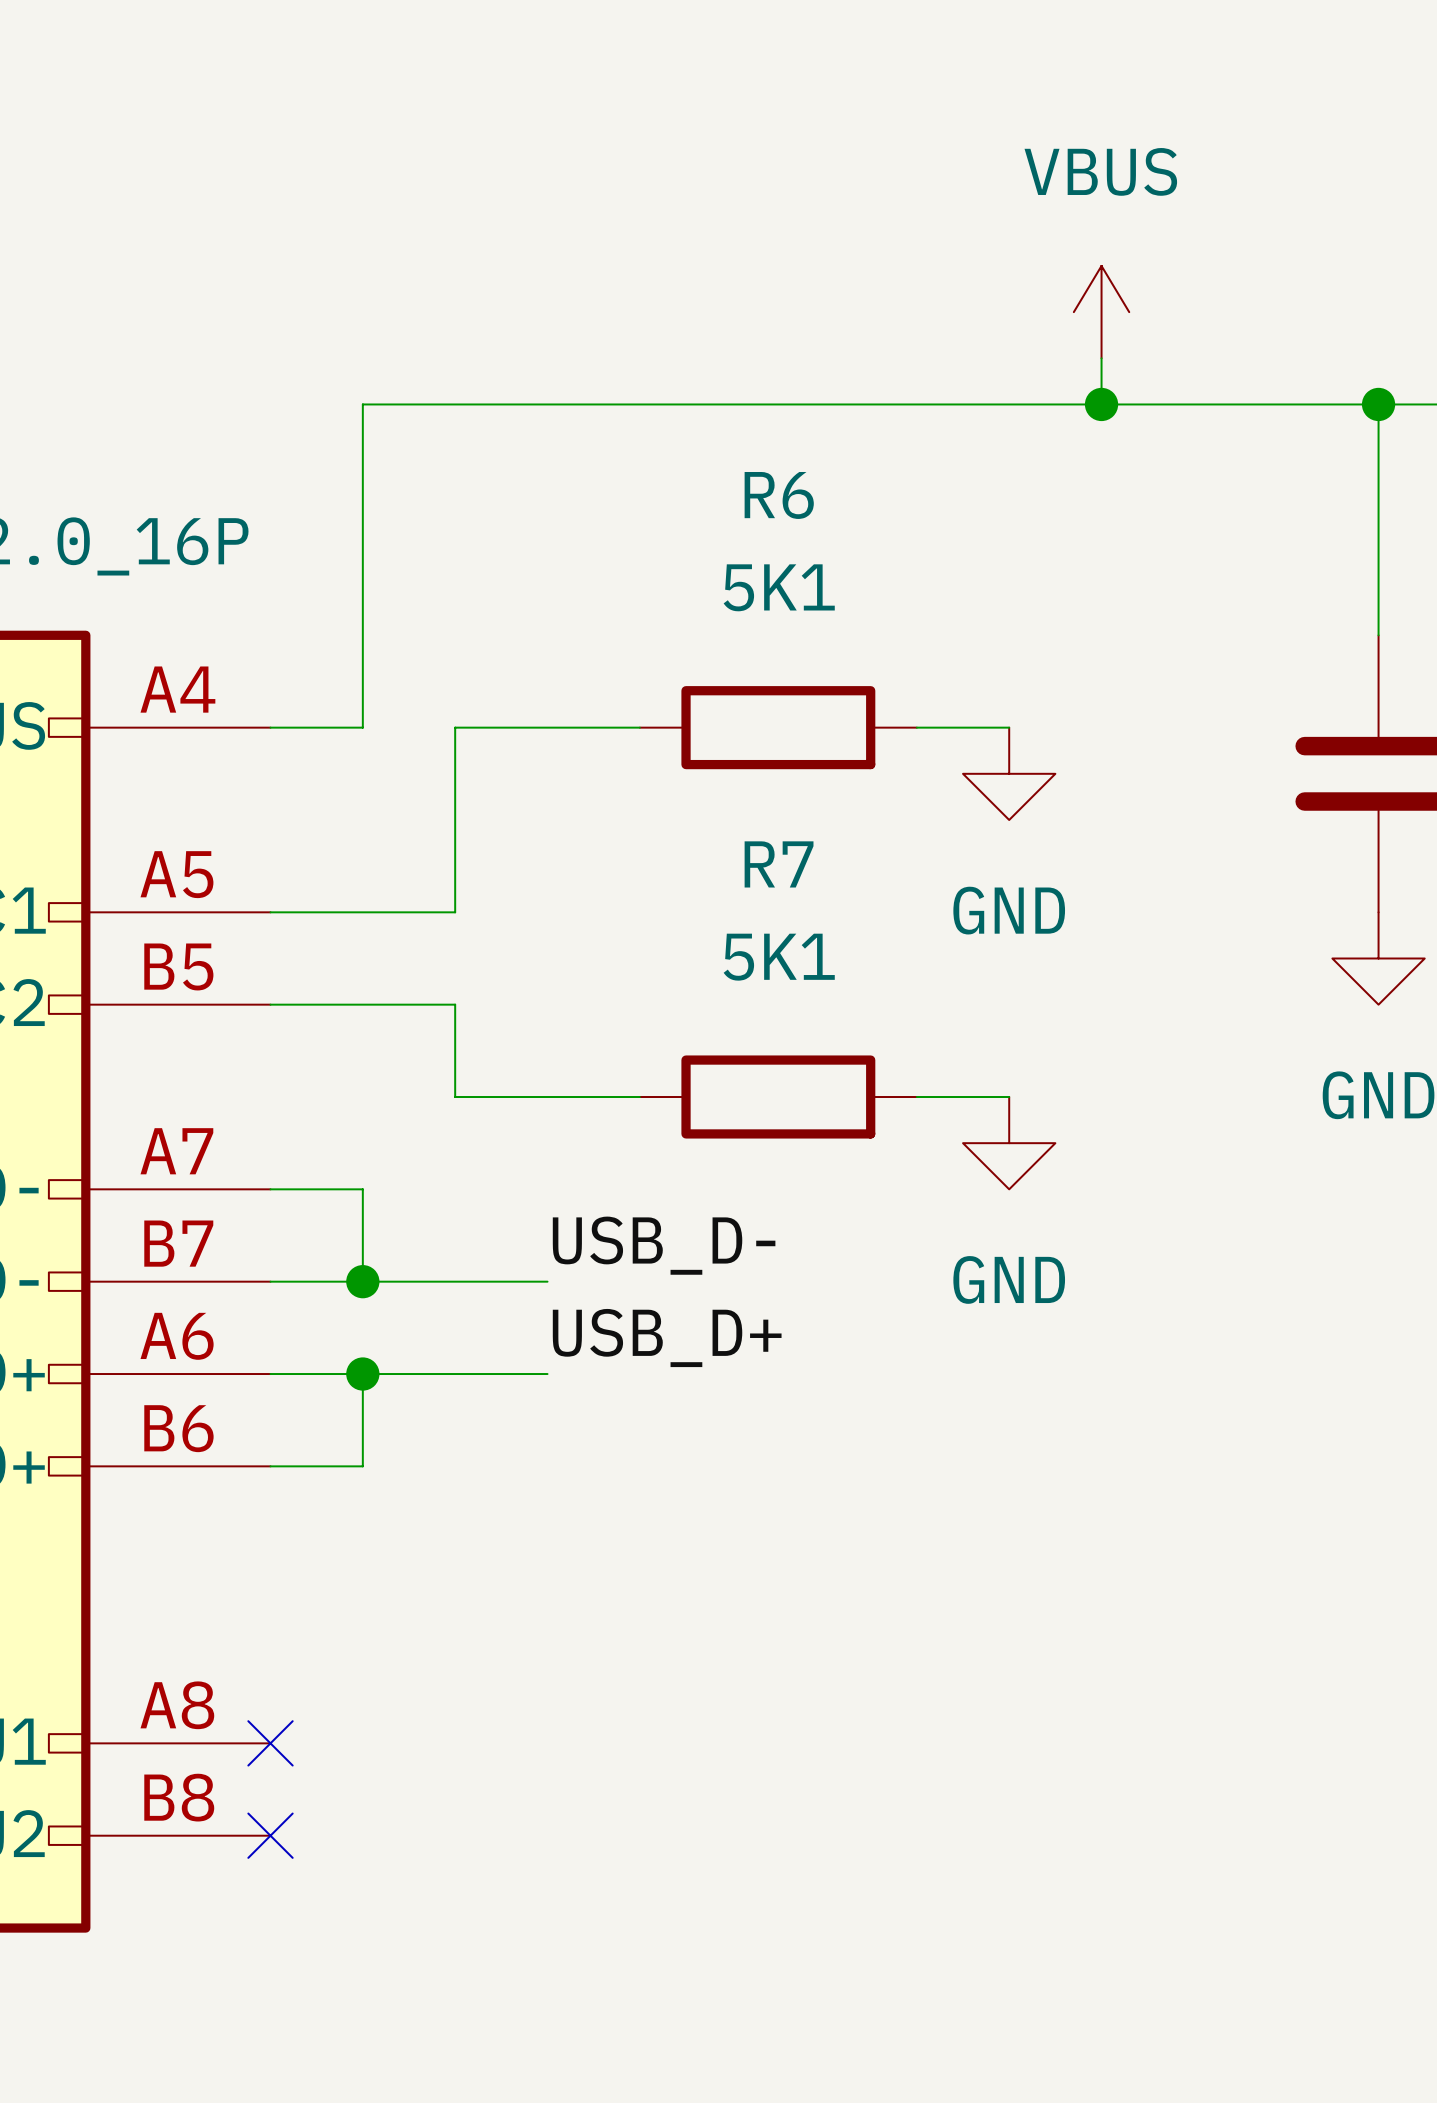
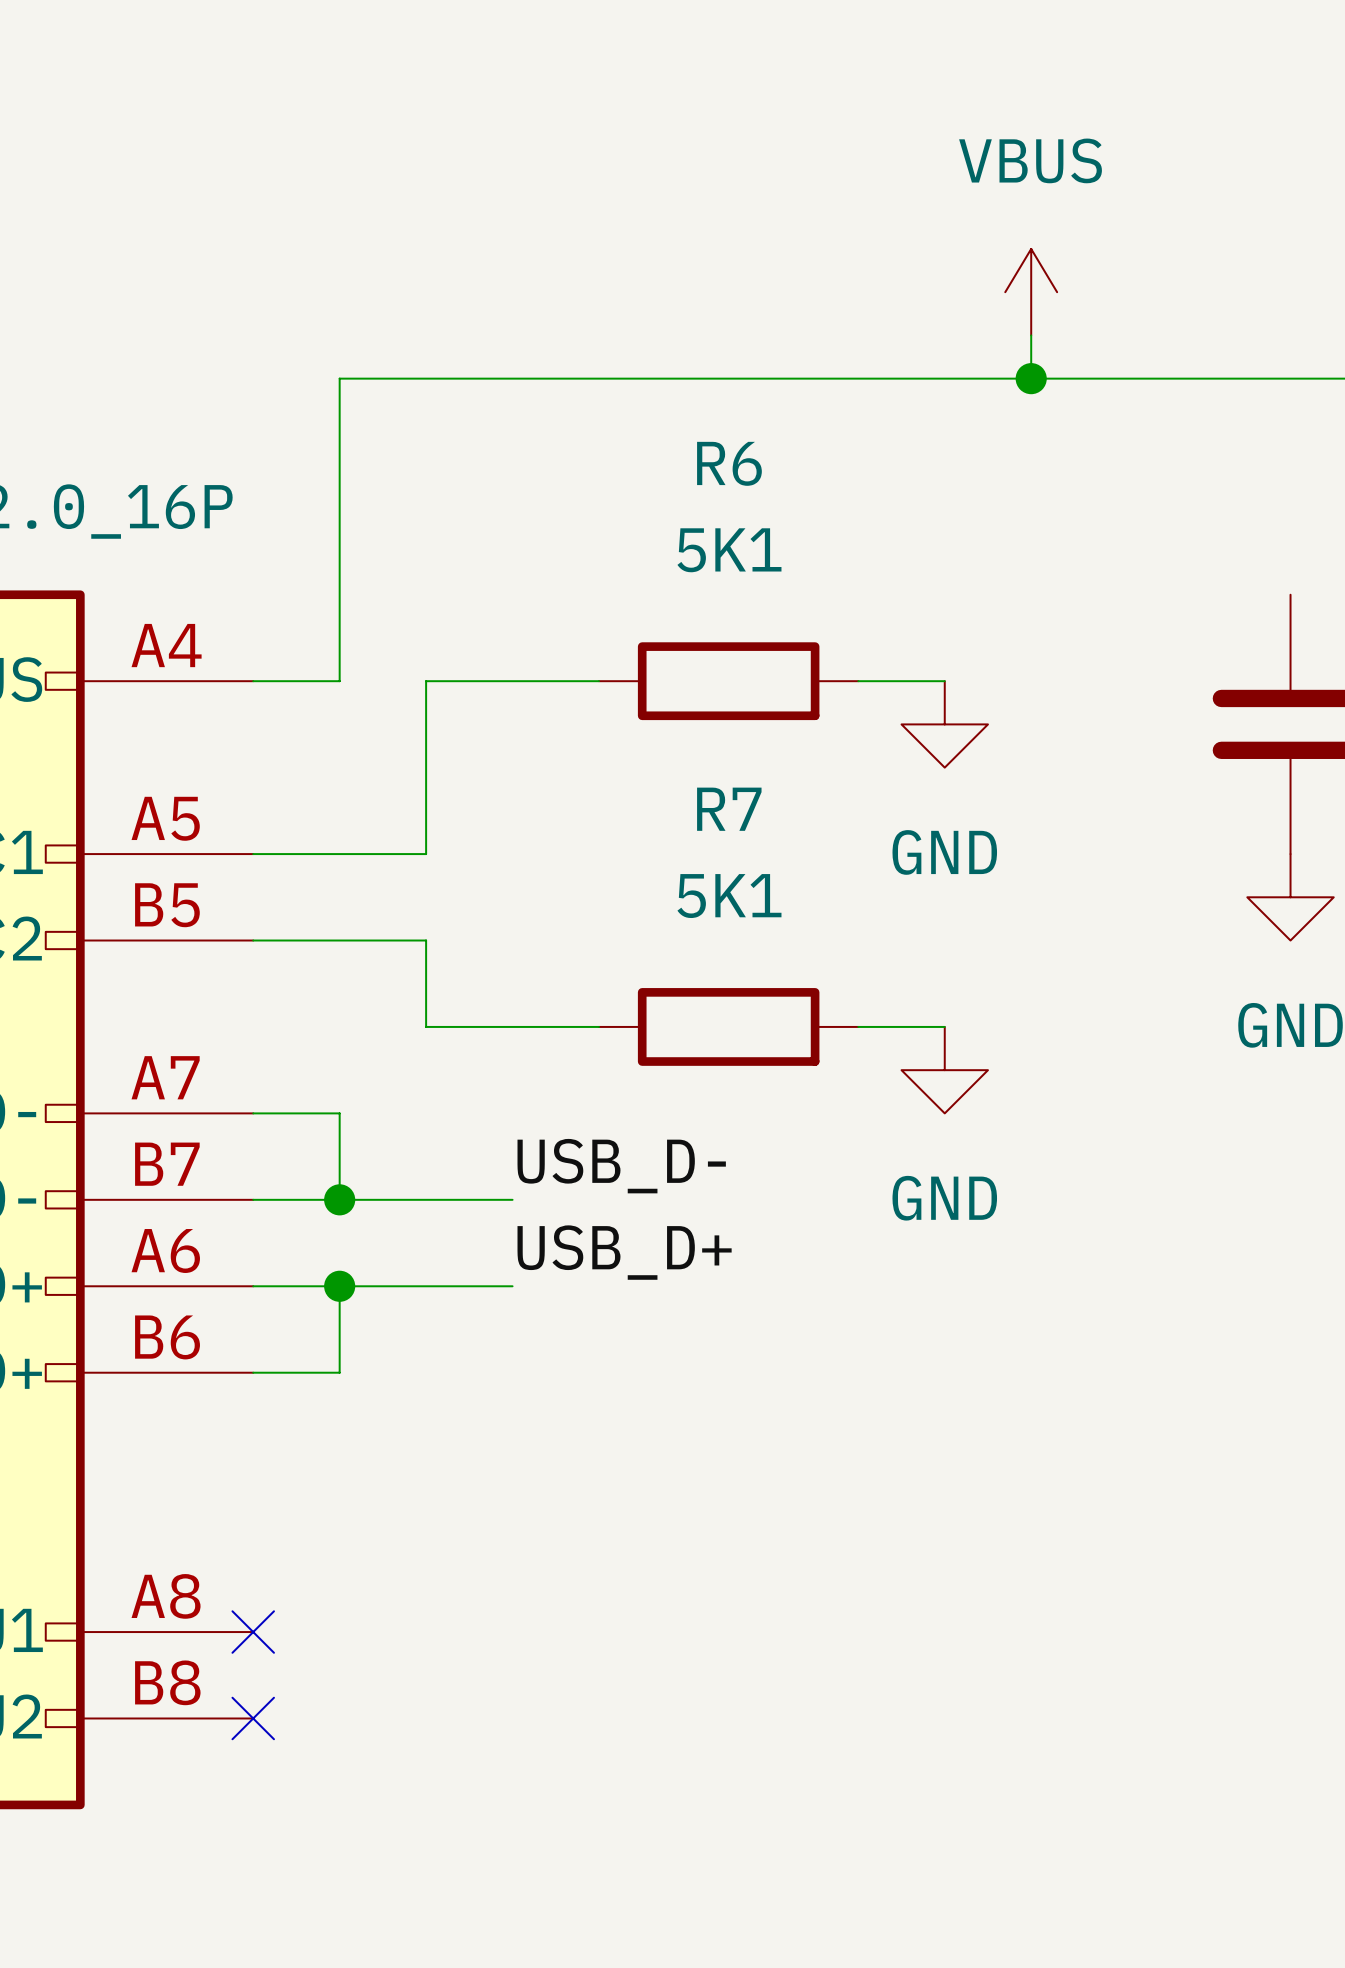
wire: (1378, 404) (1378, 635) -> none
junction: (1378, 404) -> none

